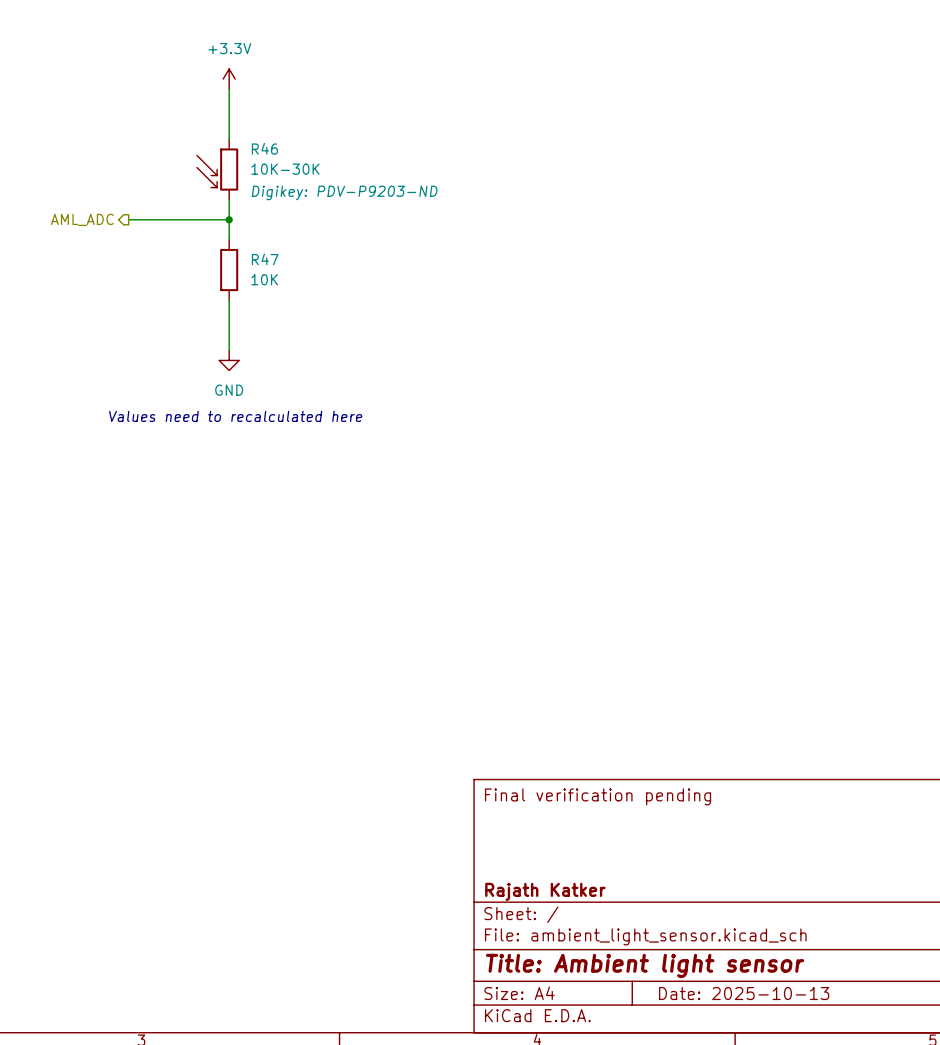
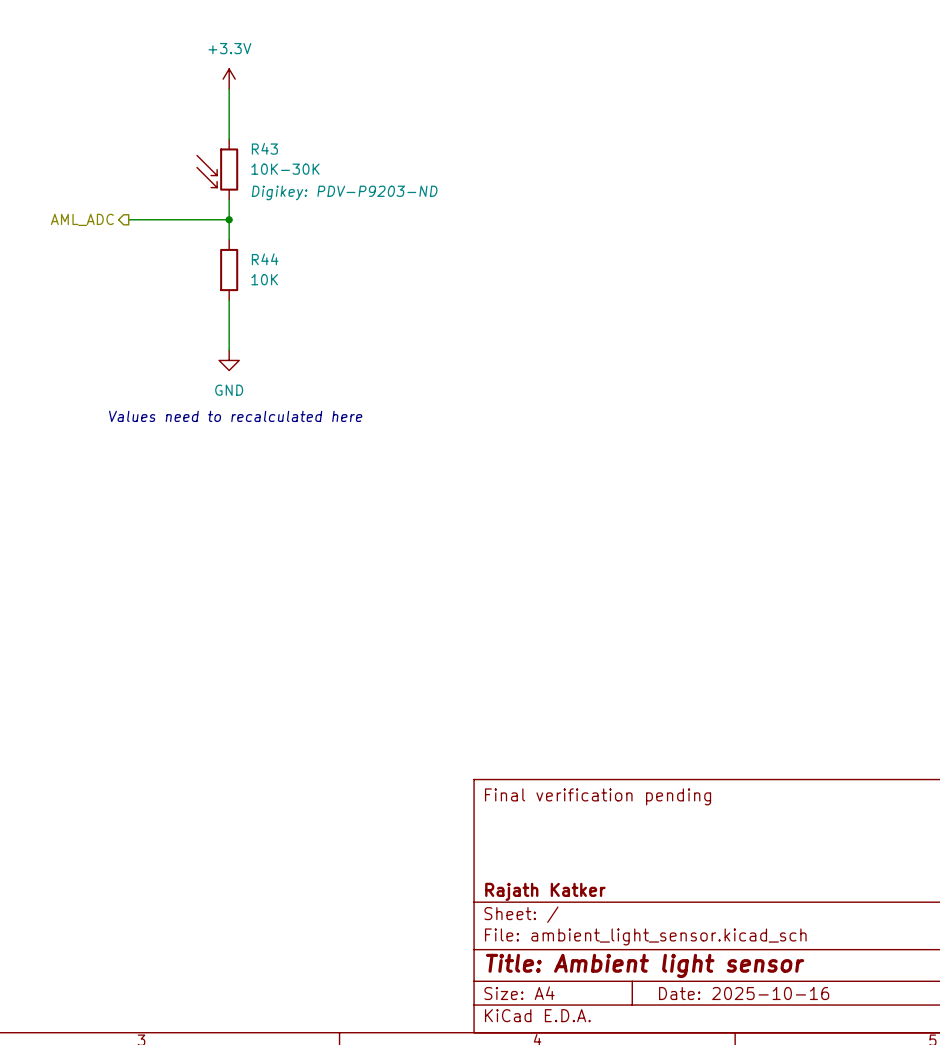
R46 name: R46 (264, 148) -> R43 (264, 148)
R47 name: R47 (265, 259) -> R44 (265, 259)
title block: Date: 2025-10-13 (744, 993) -> Date: 2025-10-16 (744, 993)

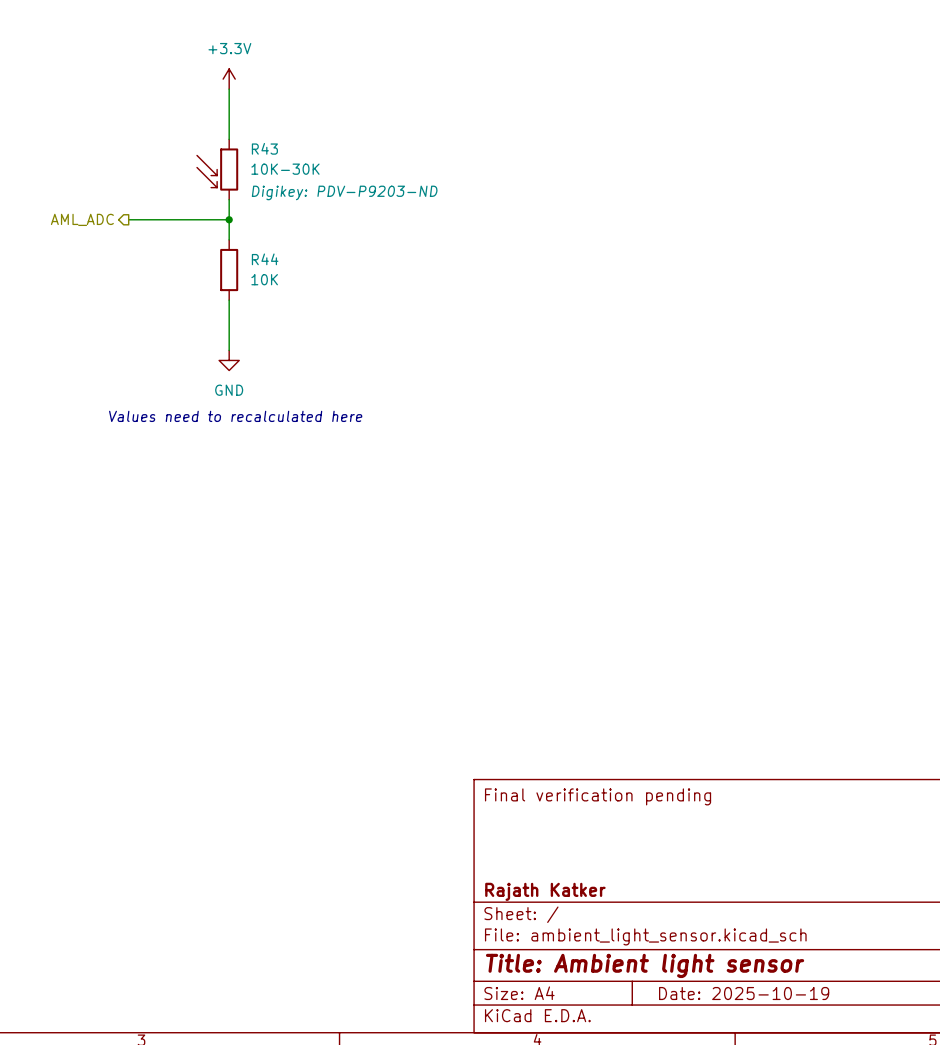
title block: Date: 2025-10-16 (744, 993) -> Date: 2025-10-19 (744, 993)

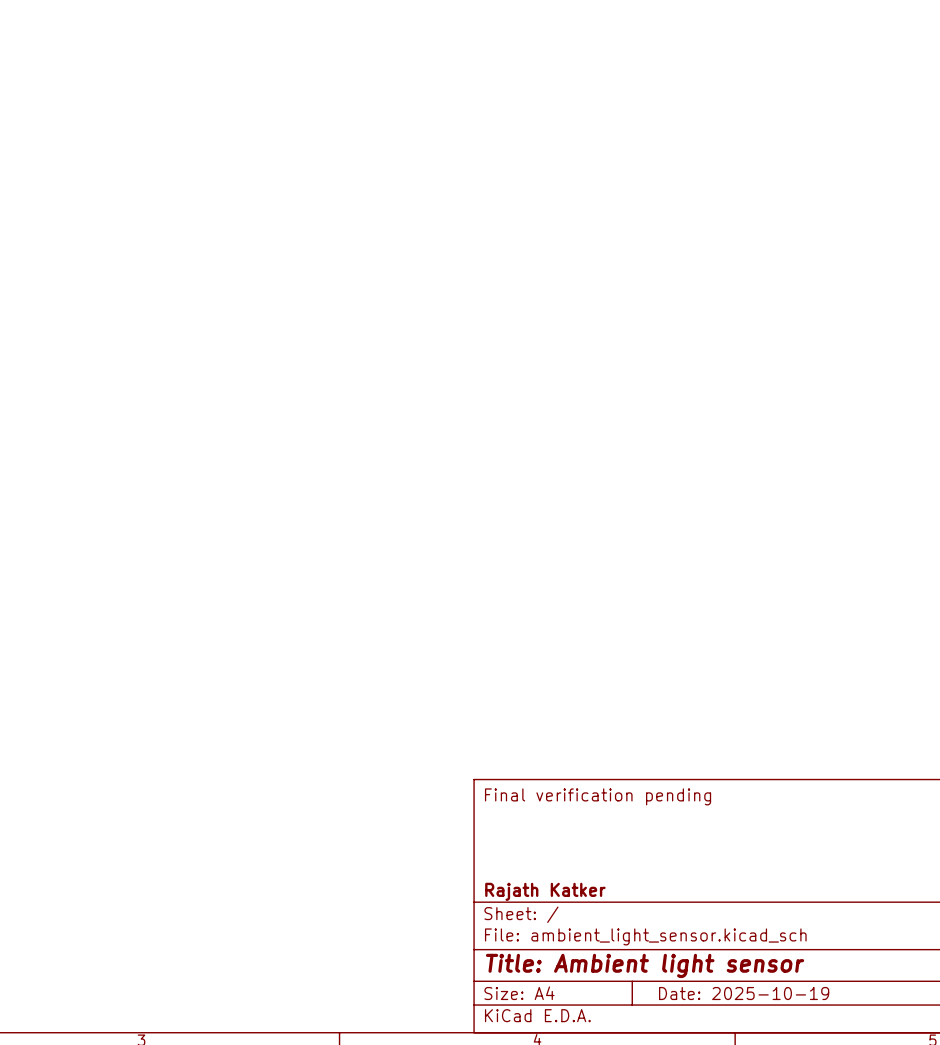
power symbol: +3.3V (229, 79) -> none
wire: (229, 89) (229, 139) -> none
R43: 10K-30K (217, 169) -> none
wire: (229, 199) (229, 239) -> none
hierarchical label: AML_ADC (82, 219) -> none
wire: (128, 219) (229, 219) -> none
junction: (229, 219) -> none
R44: 10K (229, 270) -> none
wire: (229, 300) (229, 350) -> none
power symbol: GND (229, 360) -> none
text: Values need to recalculated here (235, 416) -> none

